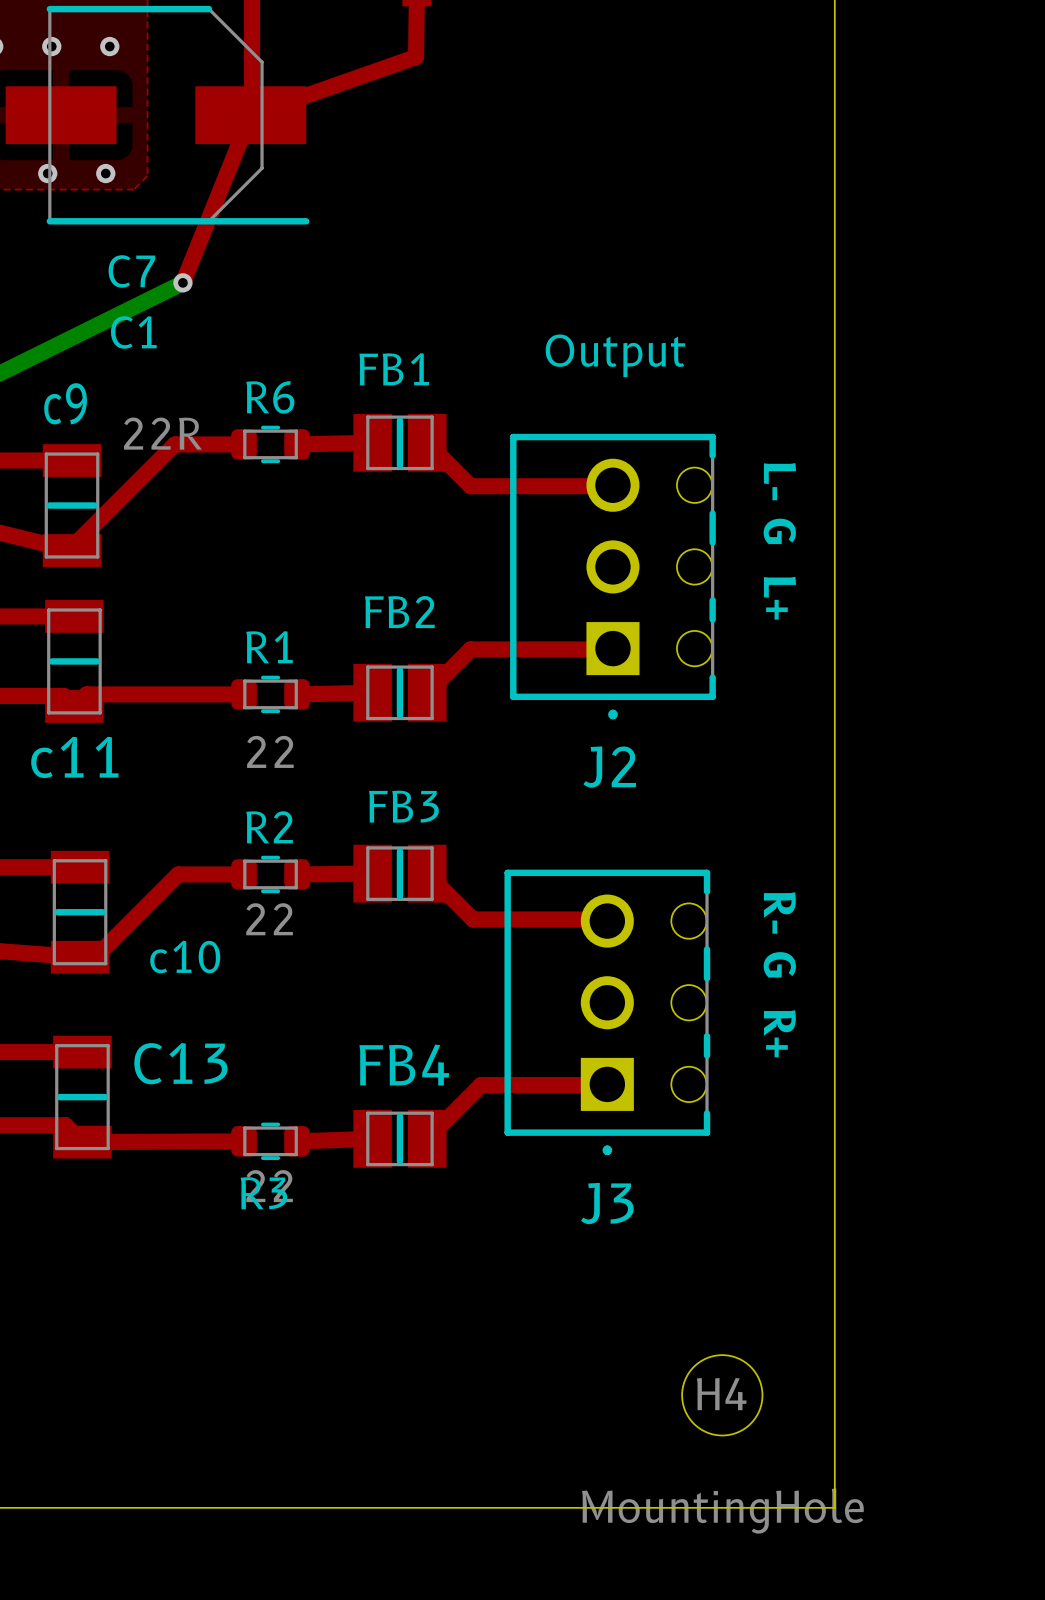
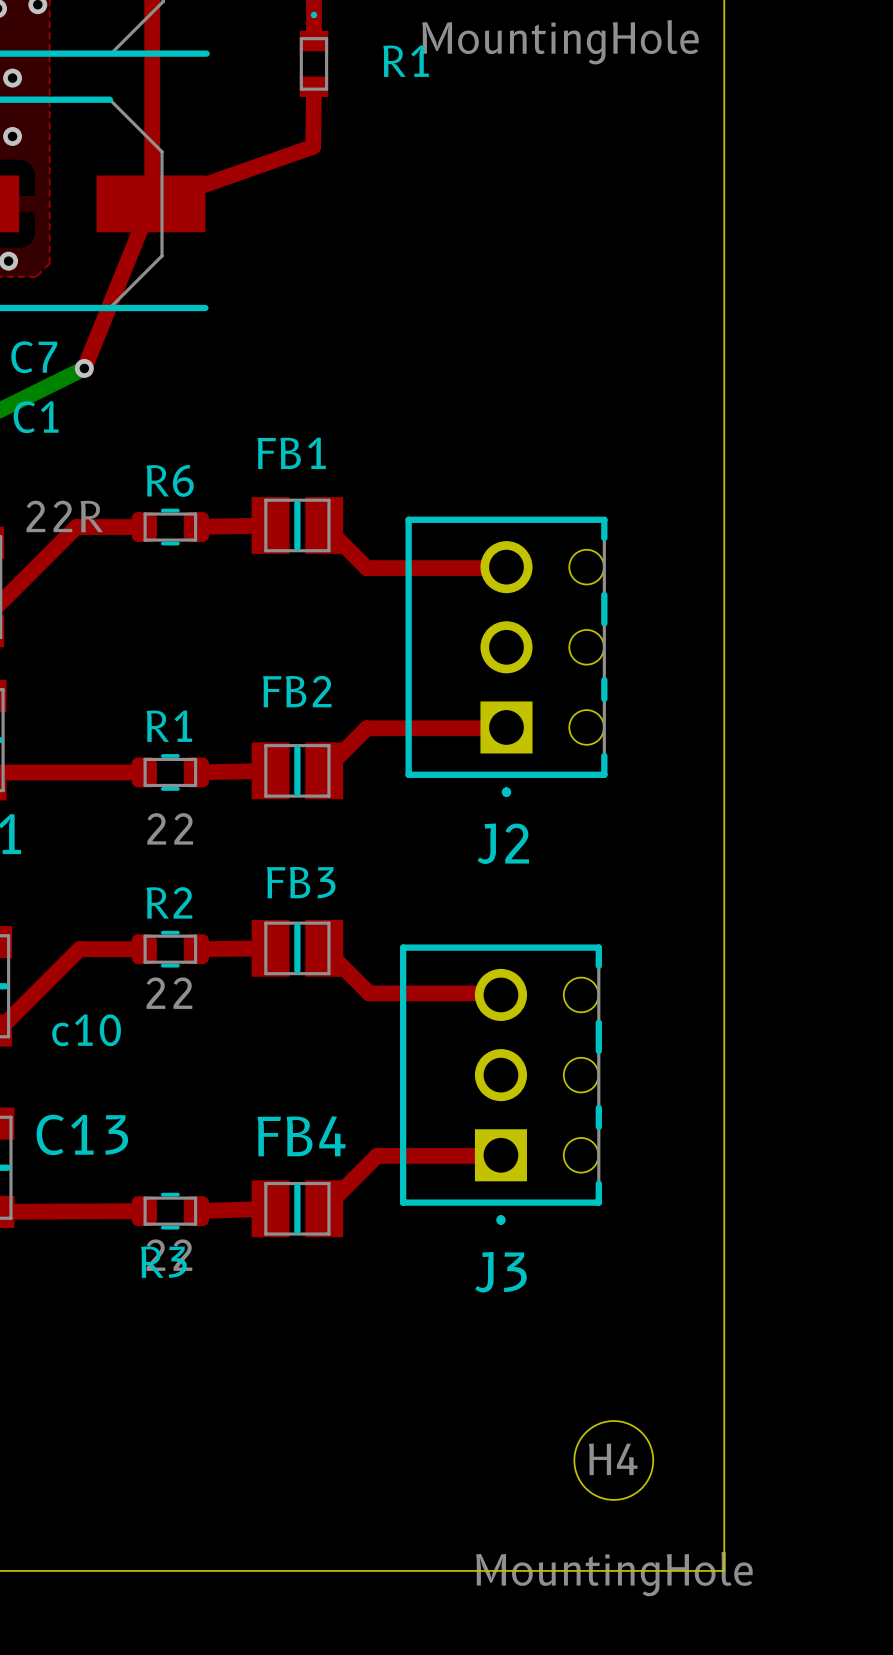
text: Output (615, 355) -> none
text: L- G L+ (779, 541) -> none
text: R- G R+ (779, 974) -> none

